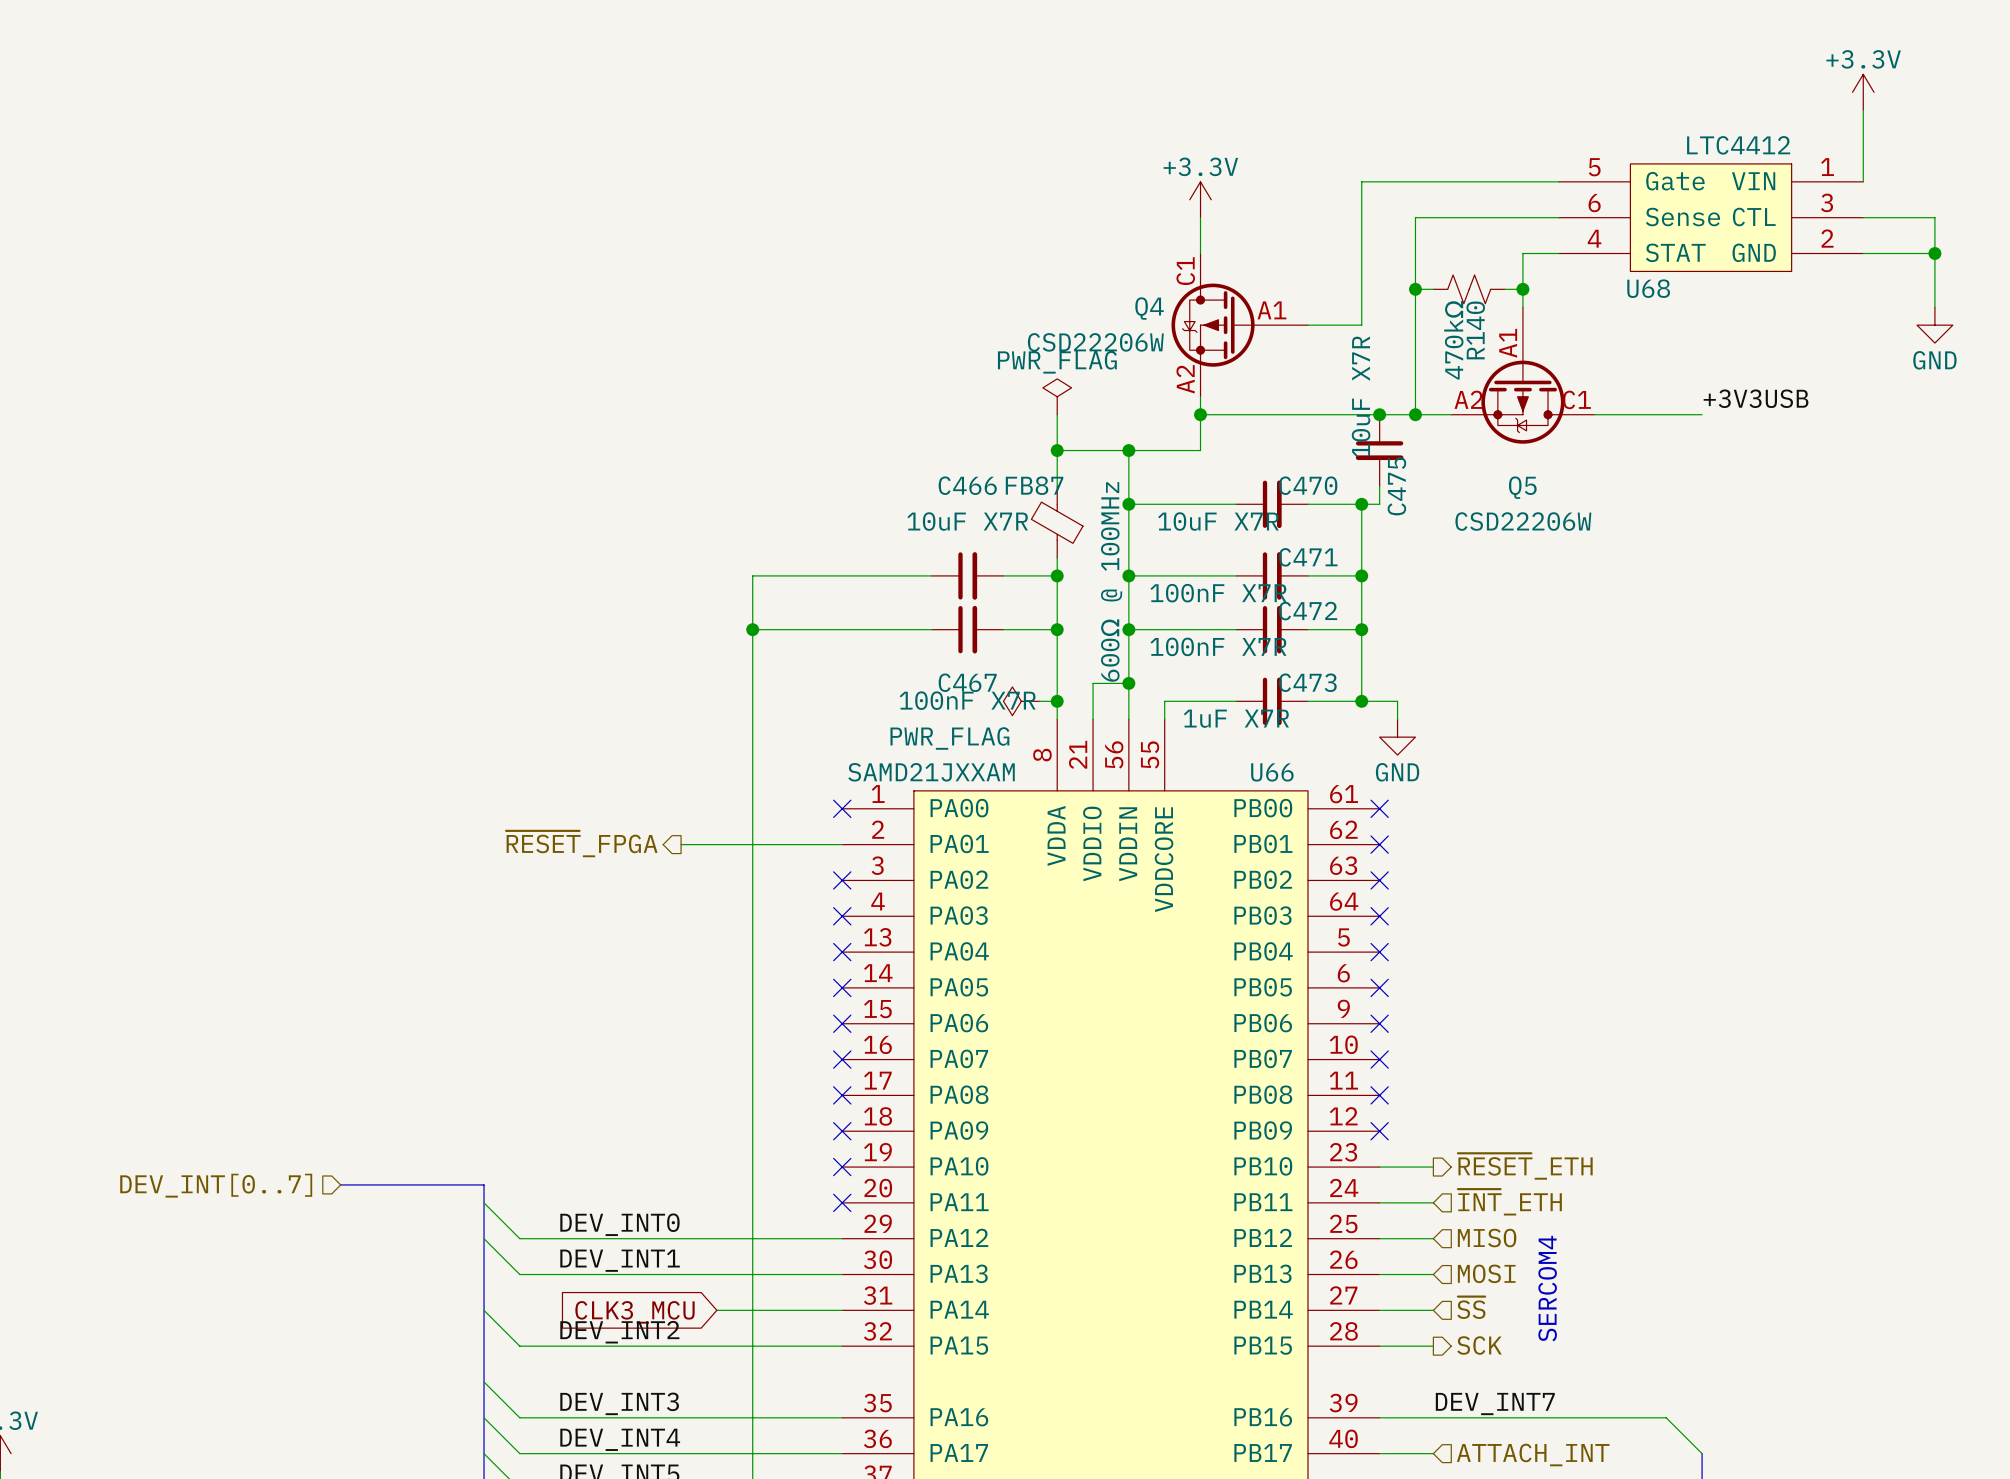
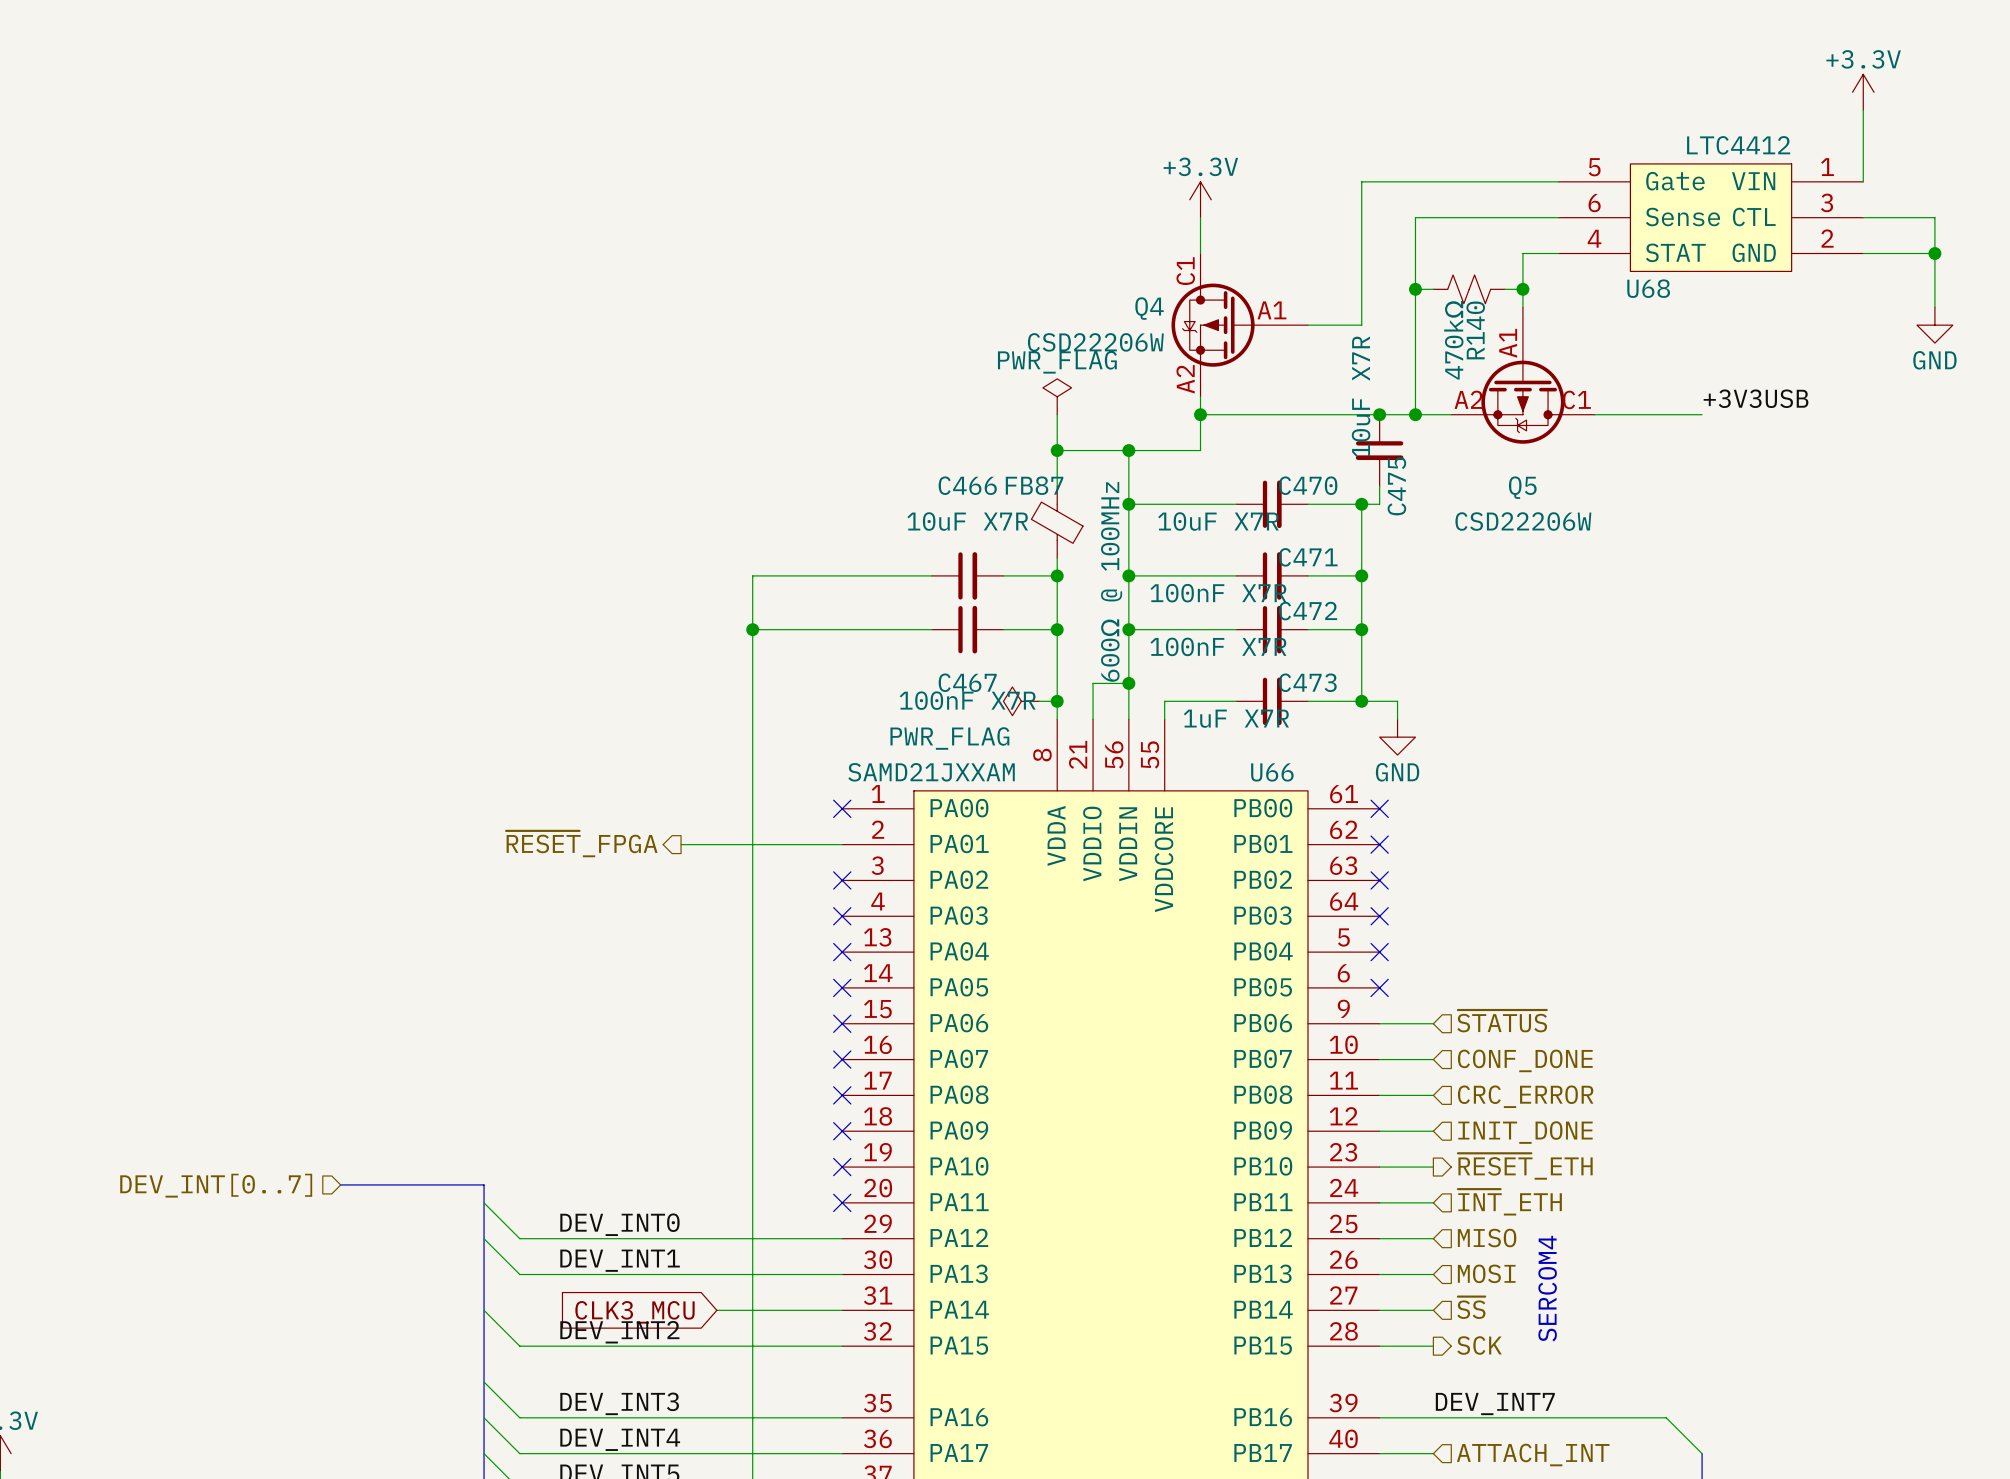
hierarchical label: none -> ~{STATUS} (1502, 1021)
wire: none -> (1379, 1023) (1433, 1023)
no-connect mark: (1379, 1023) -> none
wire: none -> (1379, 1059) (1433, 1059)
no-connect mark: (1379, 1059) -> none
hierarchical label: none -> CONF_DONE (1525, 1060)
wire: none -> (1379, 1095) (1433, 1095)
no-connect mark: (1379, 1095) -> none
hierarchical label: none -> CRC_ERROR (1525, 1096)
wire: none -> (1379, 1131) (1433, 1131)
no-connect mark: (1379, 1131) -> none
hierarchical label: none -> INIT_DONE (1525, 1132)

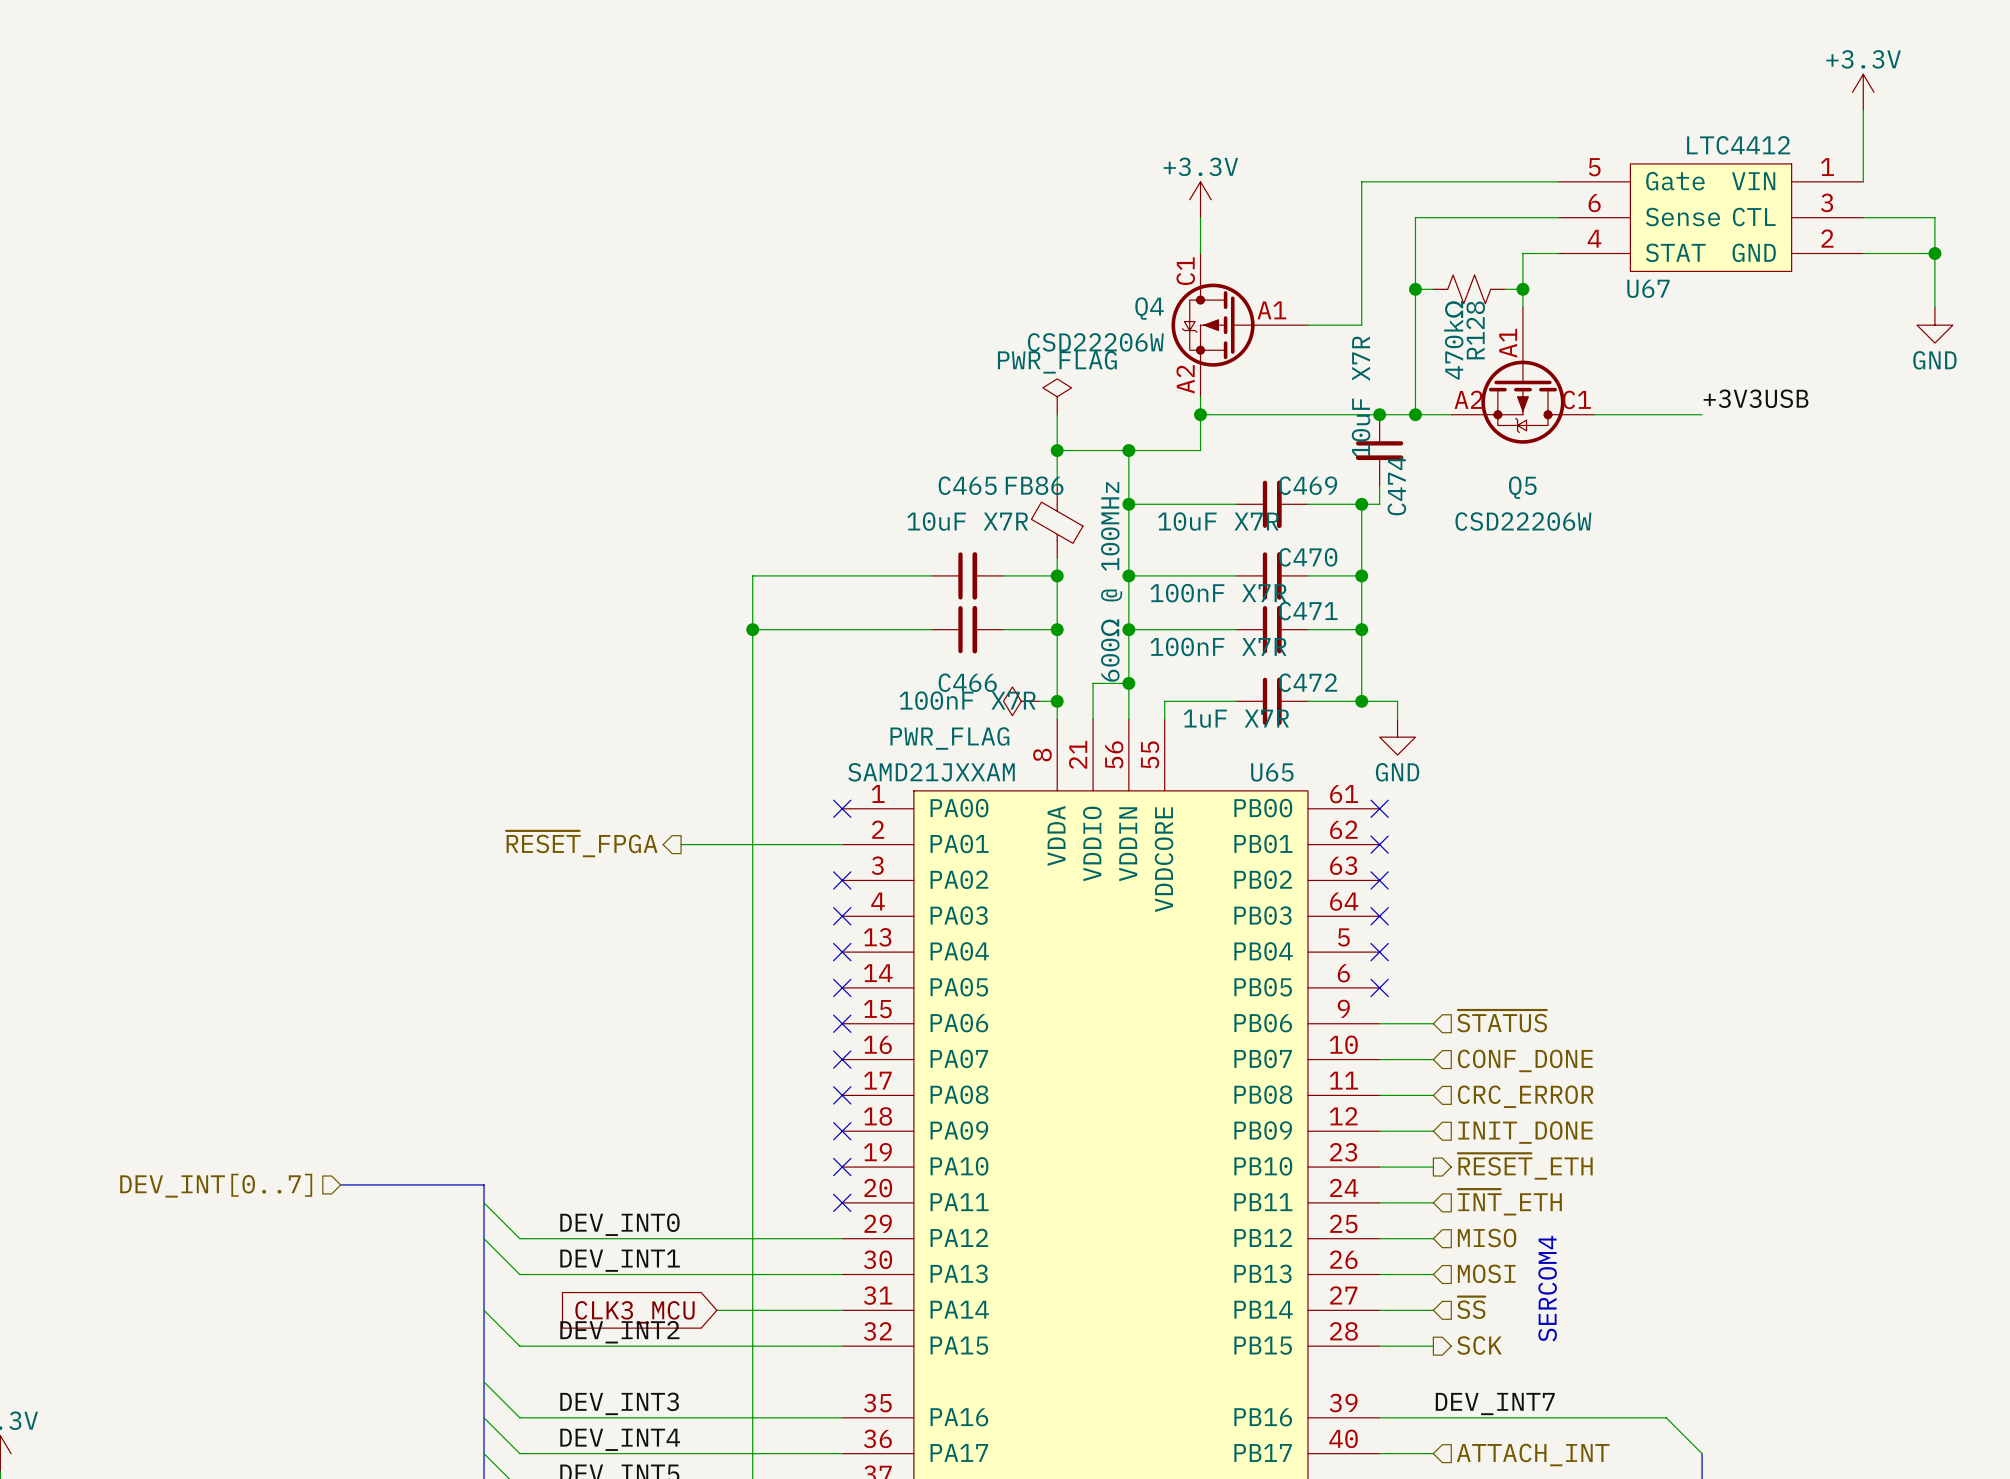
U68 name: U68 (1648, 288) -> U67 (1648, 288)
R140 name: R140 (1475, 330) -> R128 (1475, 330)
C466 name: C466 (967, 485) -> C465 (967, 485)
FB87 name: FB87 (1034, 485) -> FB86 (1034, 485)
C470 name: C470 (1308, 485) -> C469 (1308, 485)
C475 name: C475 (1396, 486) -> C474 (1396, 485)
C471 name: C471 (1308, 557) -> C470 (1308, 557)
C472 name: C472 (1308, 611) -> C471 (1308, 611)
C467 name: C467 (967, 682) -> C466 (967, 682)
C473 name: C473 (1307, 682) -> C472 (1308, 682)
U66 name: U66 (1272, 772) -> U65 (1272, 772)

